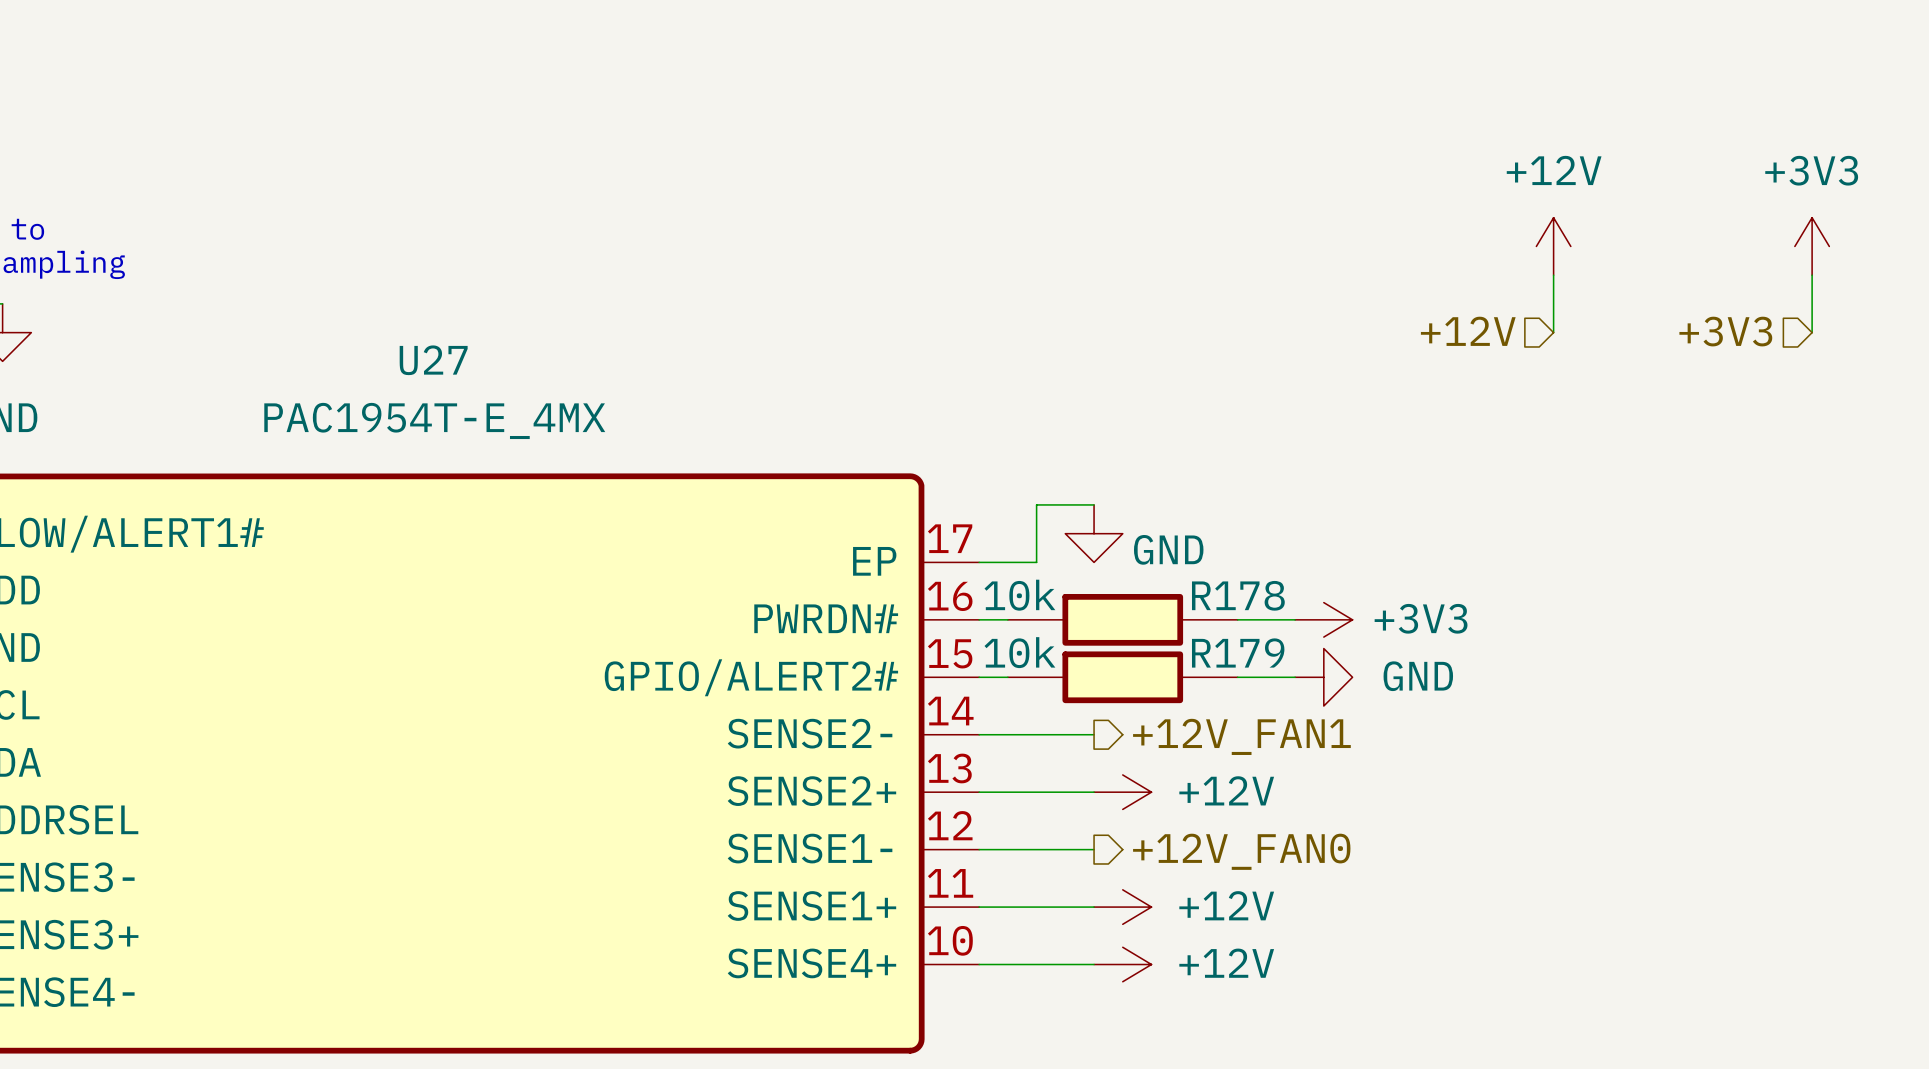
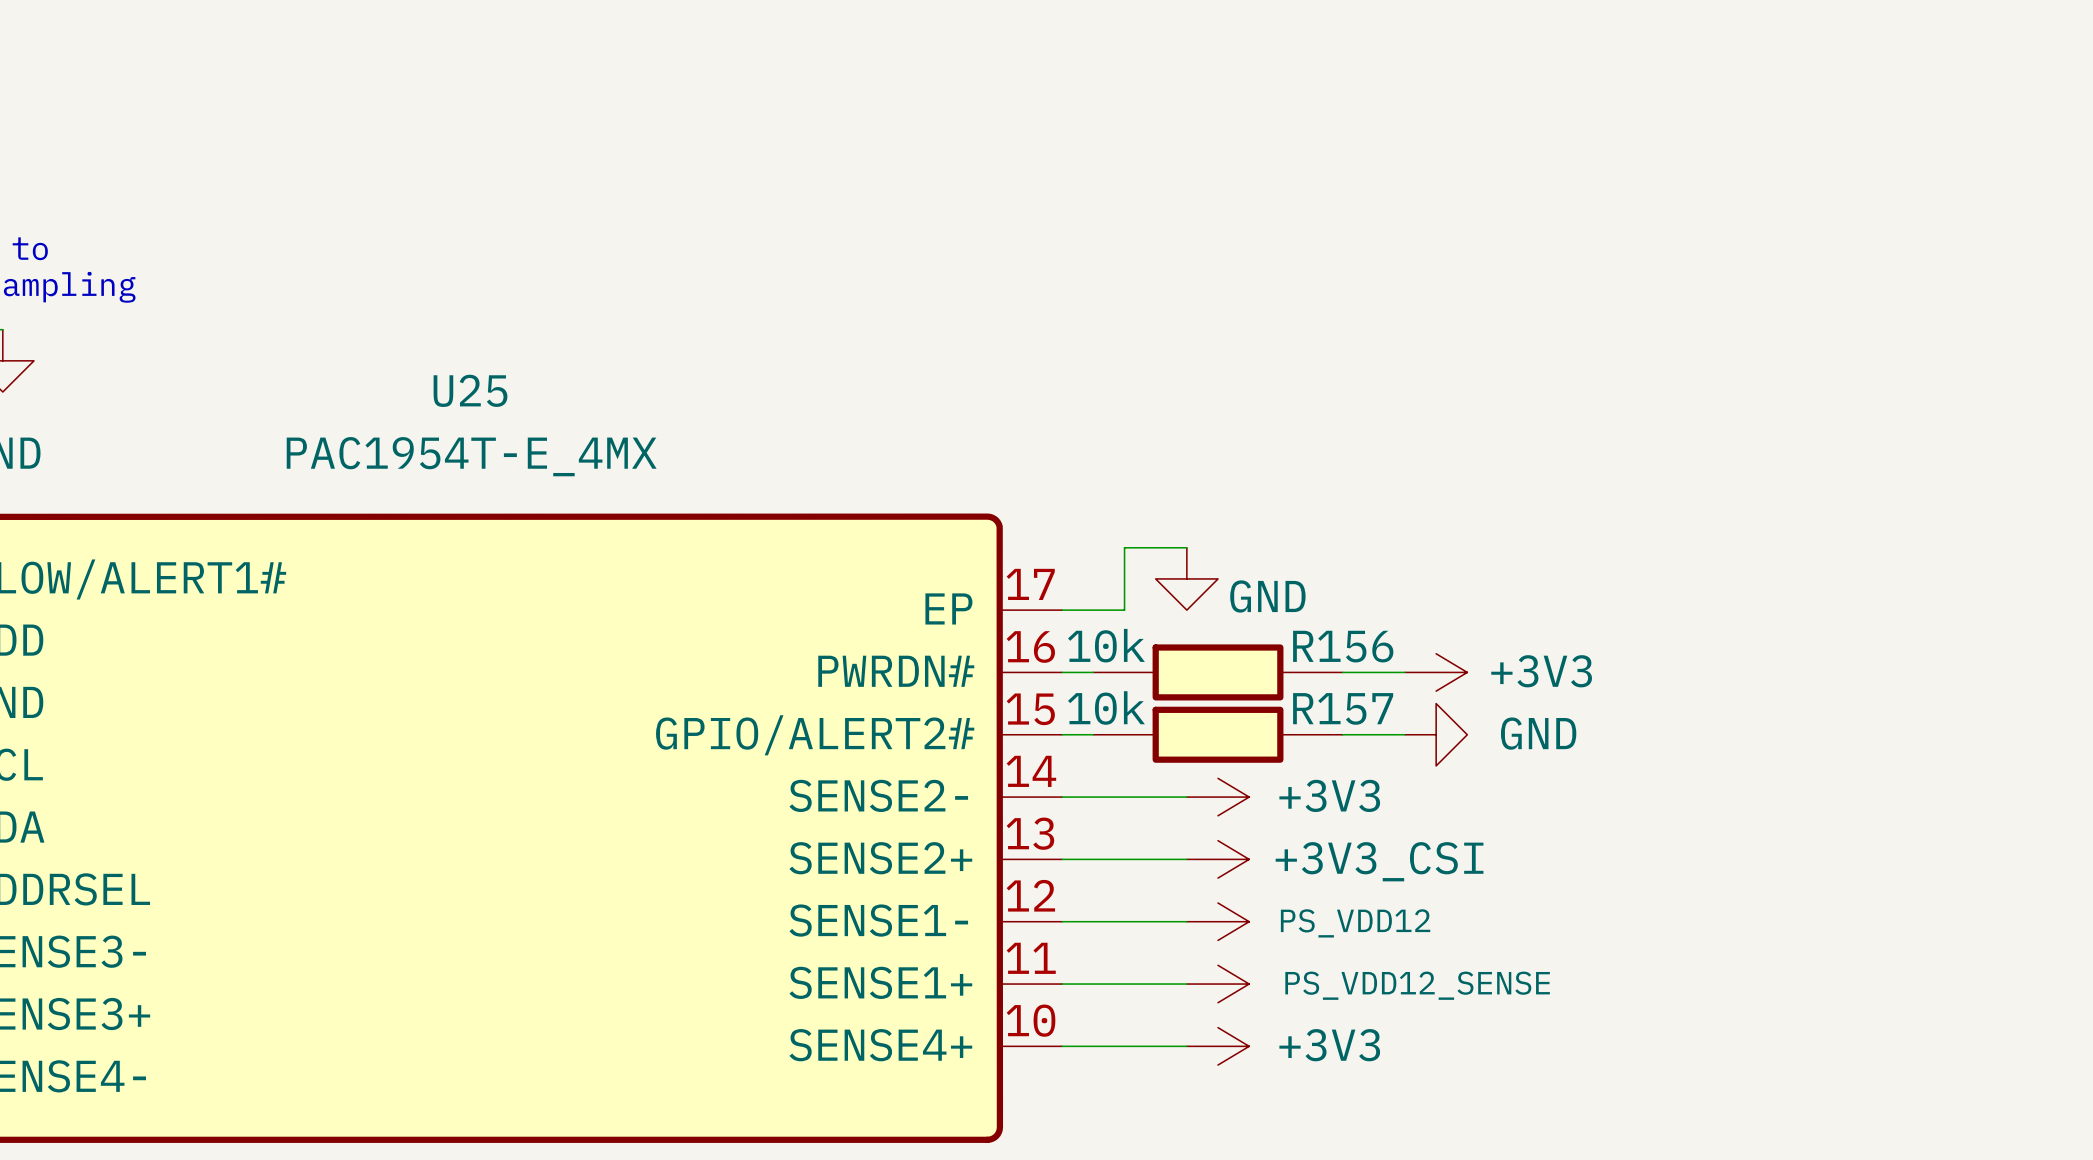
power symbol: +12V (1553, 246) -> none
power symbol: +3V3 (1812, 246) -> none
wire: (1553, 275) (1553, 332) -> none
wire: (1812, 275) (1812, 332) -> none
hierarchical label: +12V (1468, 331) -> none
hierarchical label: +3V3 (1725, 331) -> none
U27 name: U27 (433, 360) -> U25 (470, 390)
R178 name: R178 (1238, 595) -> R156 (1343, 646)
R179 name: R179 (1238, 652) -> R157 (1343, 708)
power symbol: none -> +3V3 (1218, 797)
hierarchical label: +12V_FAN1 (1241, 736) -> none
power symbol: +12V (1122, 792) -> +3V3_CSI (1218, 859)
power symbol: none -> PS_VDD12 (1218, 921)
hierarchical label: +12V_FAN0 (1241, 851) -> none
power symbol: +12V (1122, 907) -> PS_VDD12_SENSE (1218, 984)
power symbol: +12V (1122, 964) -> +3V3 (1218, 1046)

